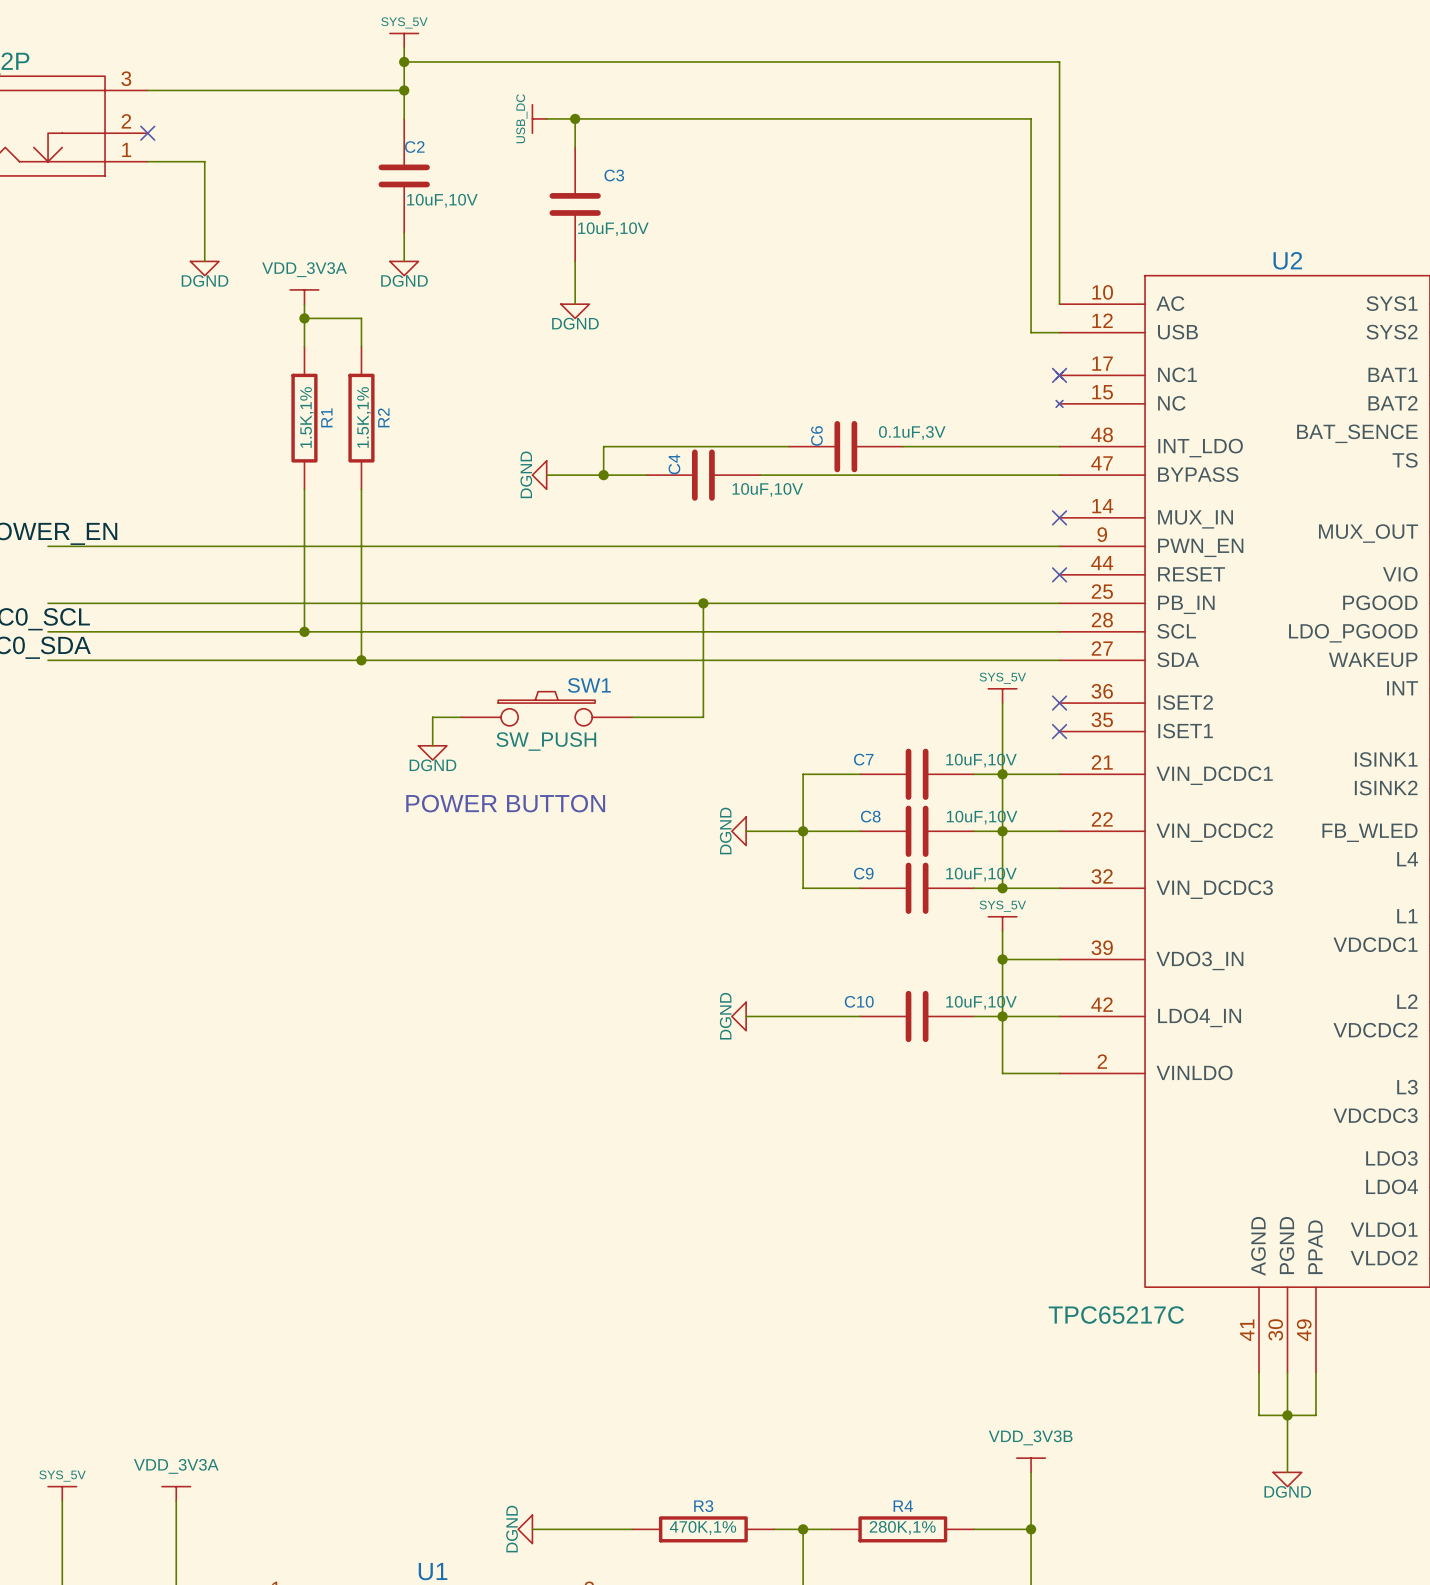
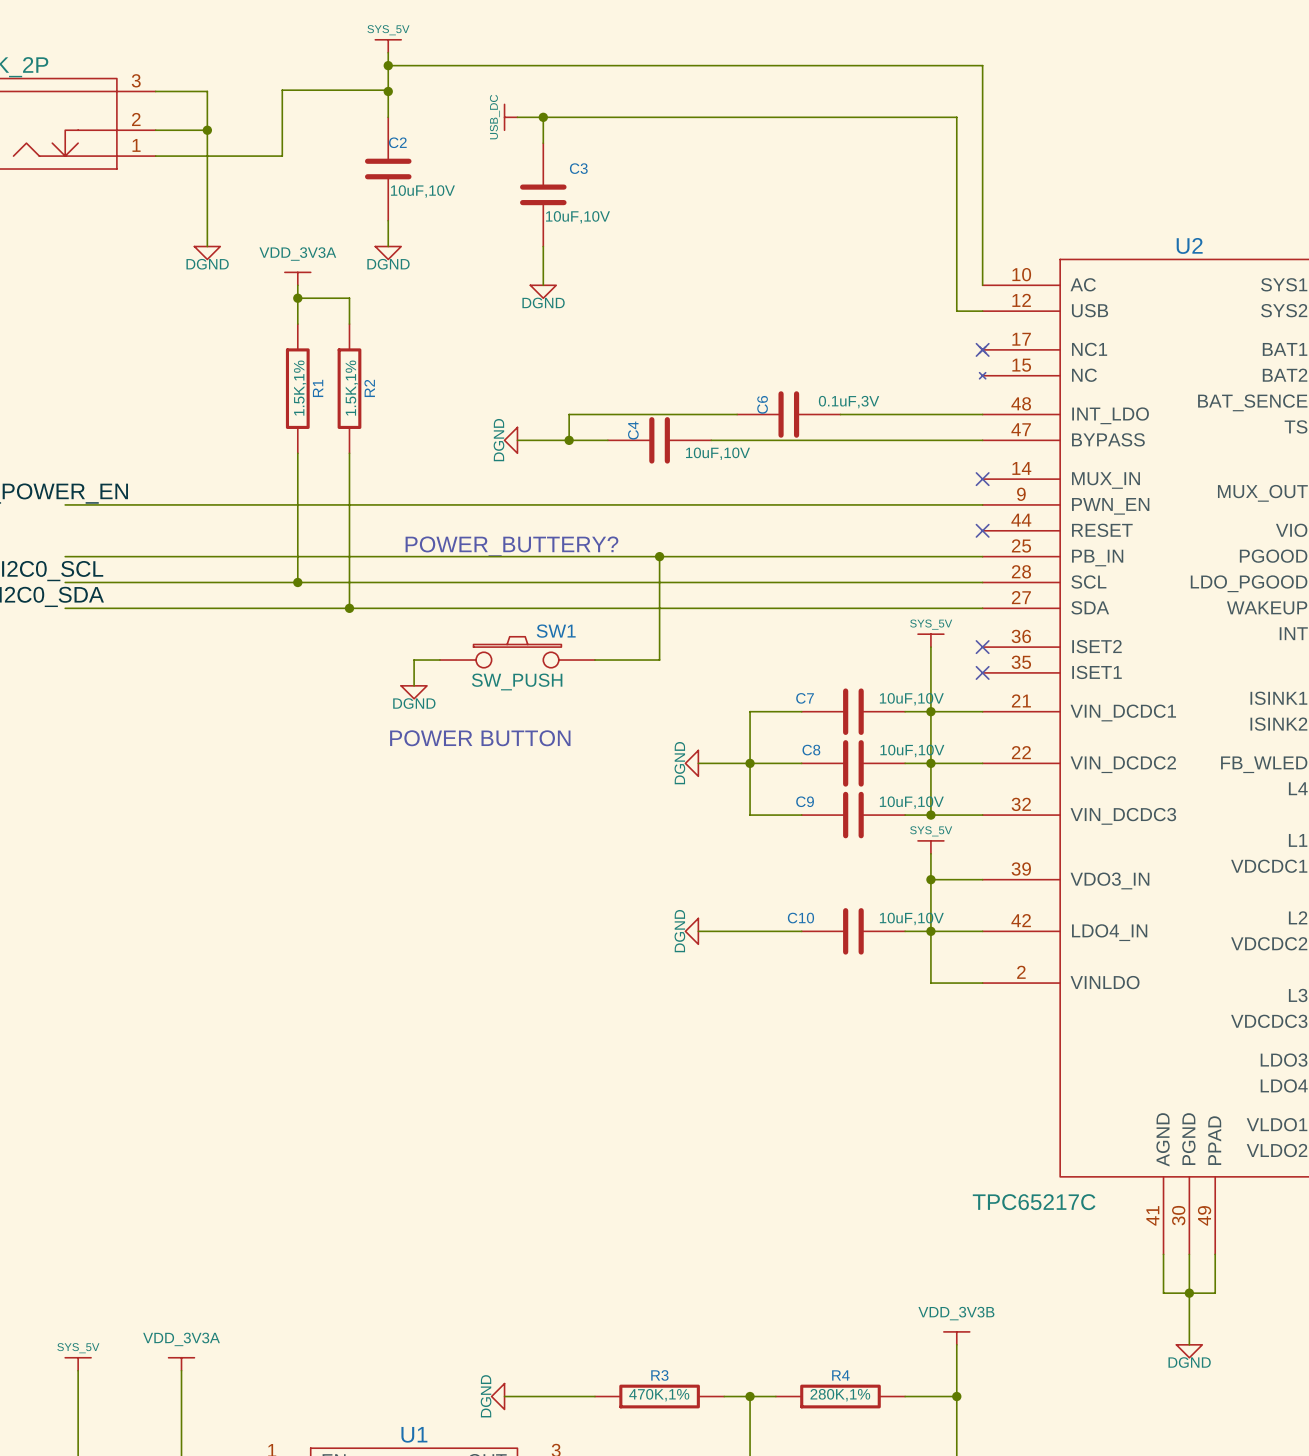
wire: (204, 90) (404, 90) -> (207, 91) (207, 156) (282, 156) (282, 90) (388, 90)
wire: none -> (155, 130) (207, 130)
no-connect mark: (147, 133) -> none
junction: none -> (207, 130)
text: none -> POWER_BUTTERY? (511, 546)

